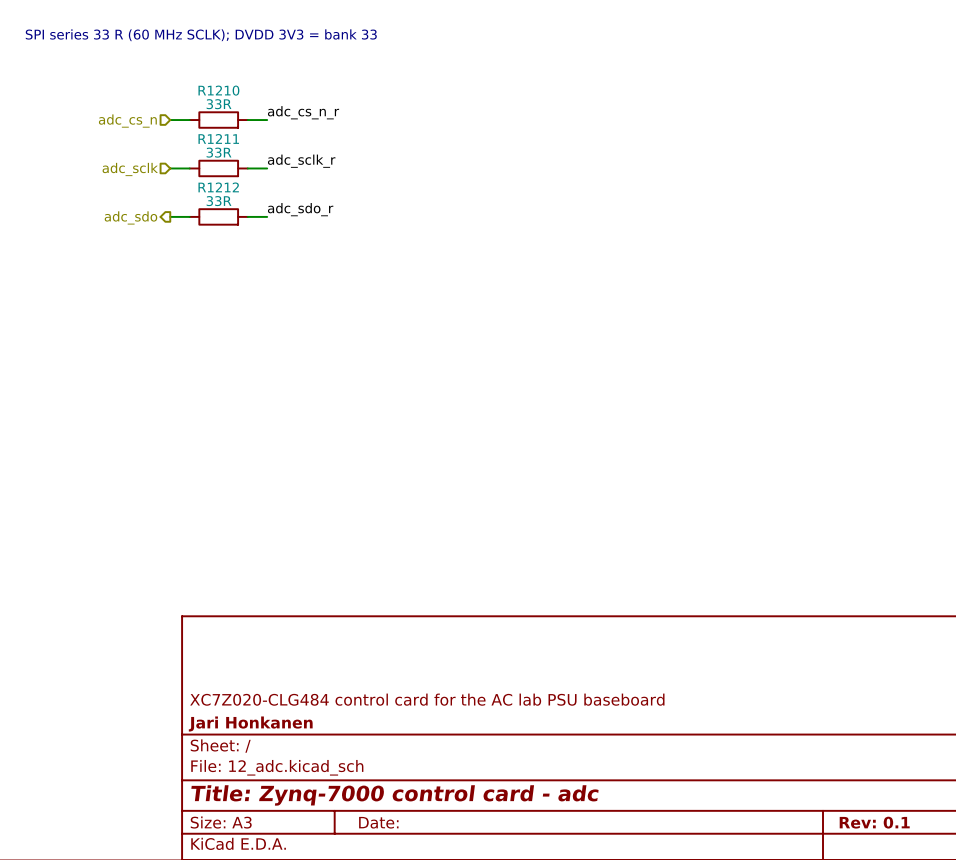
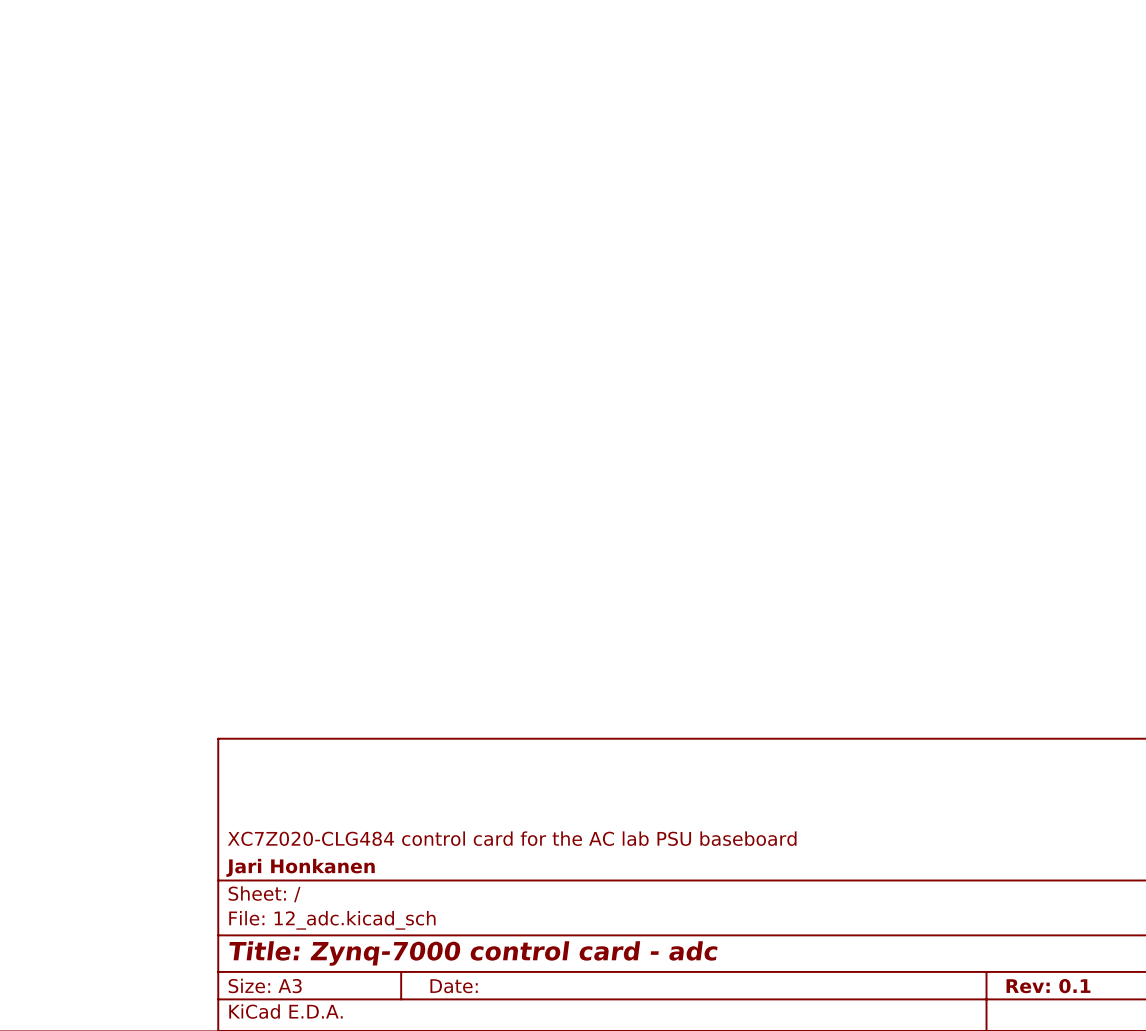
text: SPI series 33 R (60 MHz SCLK); DVDD 3V3 = bank 33 (201, 35) -> none
label: adc_cs_n_r (303, 112) -> none
wire: (170, 120) (189, 120) -> none
R1210: 33R (218, 120) -> none
wire: (247, 120) (267, 120) -> none
hierarchical label: adc_cs_n (127, 121) -> none
label: adc_sclk_r (301, 161) -> none
wire: (170, 168) (189, 168) -> none
R1211: 33R (218, 168) -> none
wire: (247, 168) (267, 168) -> none
hierarchical label: adc_sclk (130, 169) -> none
label: adc_sdo_r (300, 209) -> none
wire: (170, 216) (189, 216) -> none
R1212: 33R (218, 216) -> none
wire: (247, 216) (267, 216) -> none
hierarchical label: adc_sdo (130, 217) -> none

